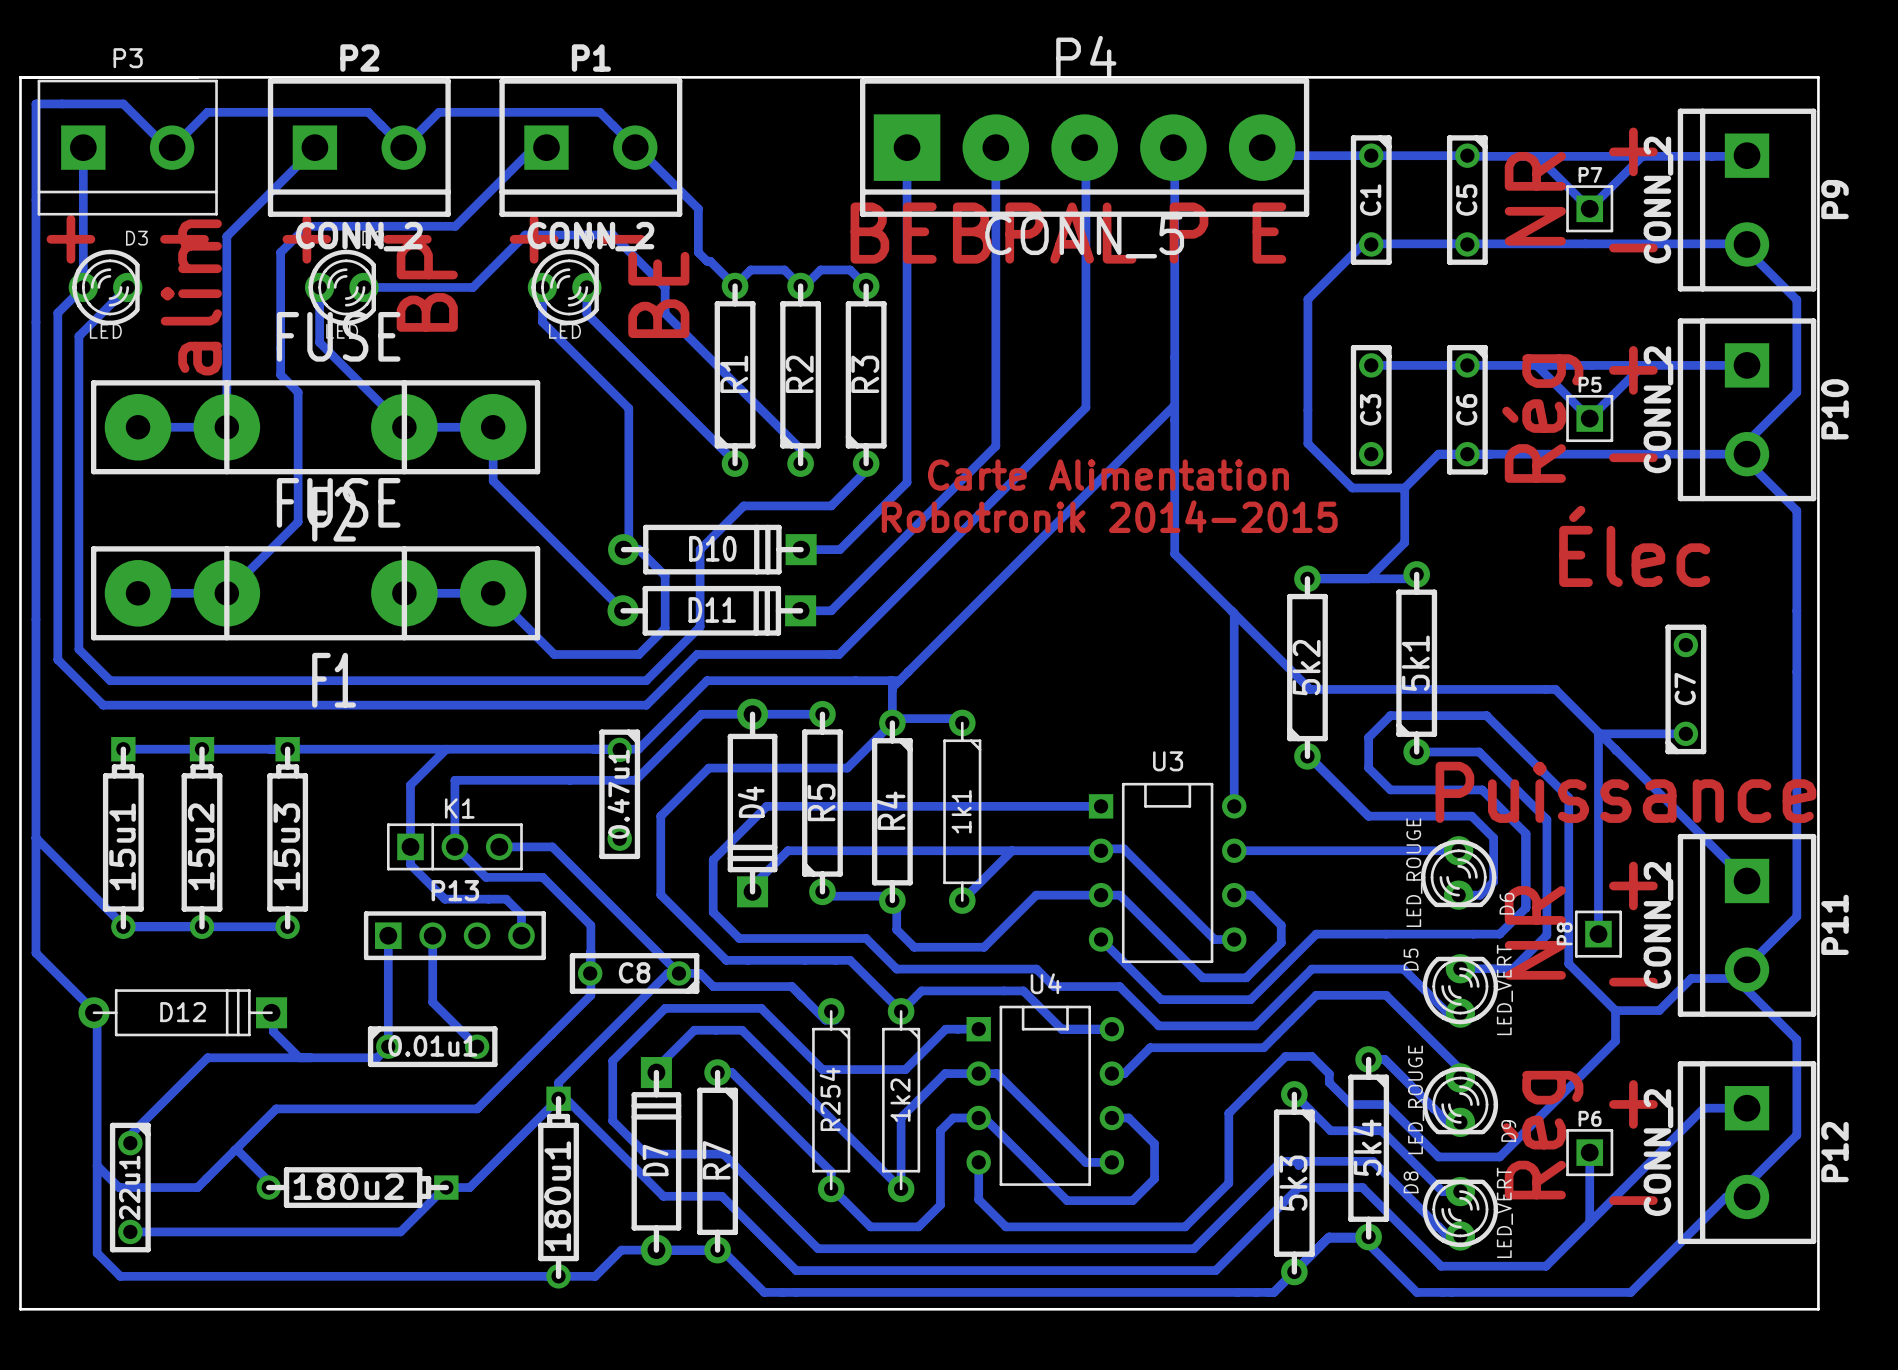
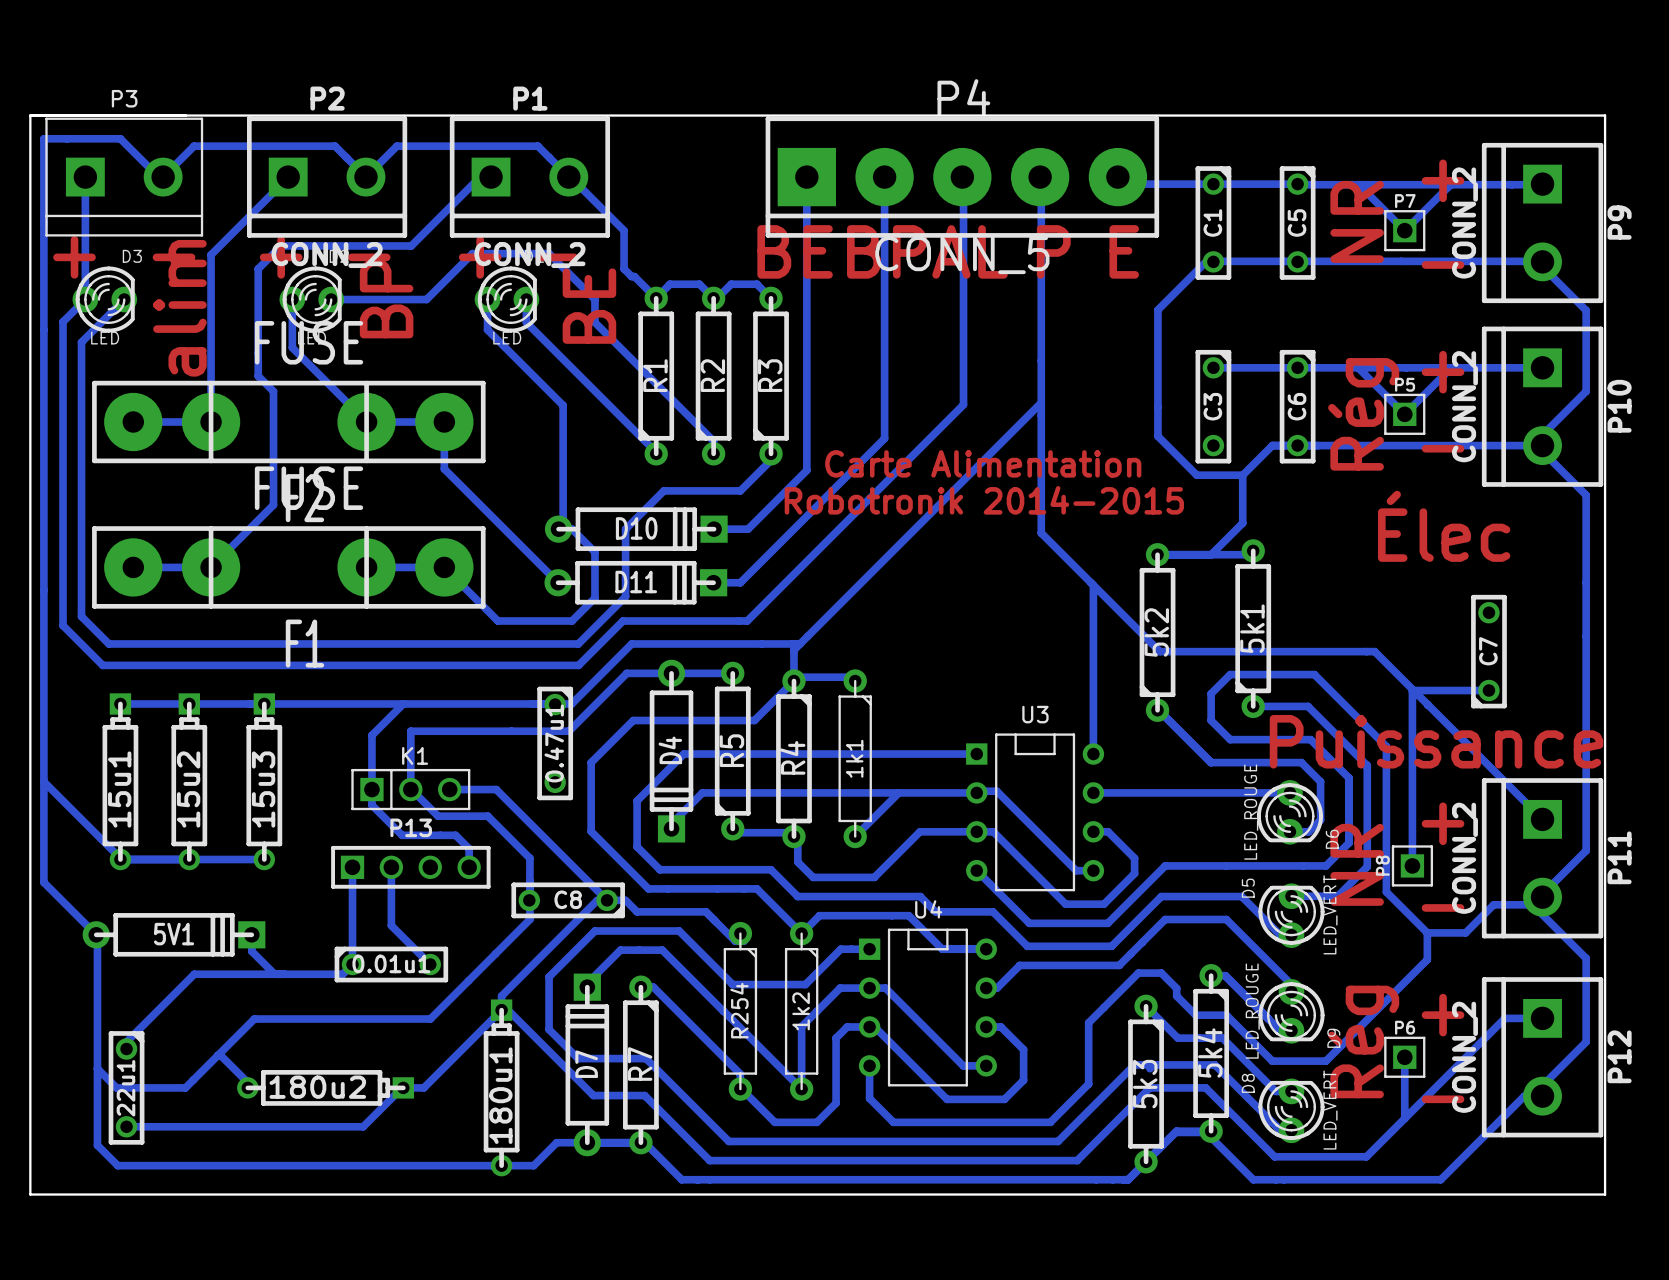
D12: (182, 1012) -> none
5V1: none -> (174, 934)

